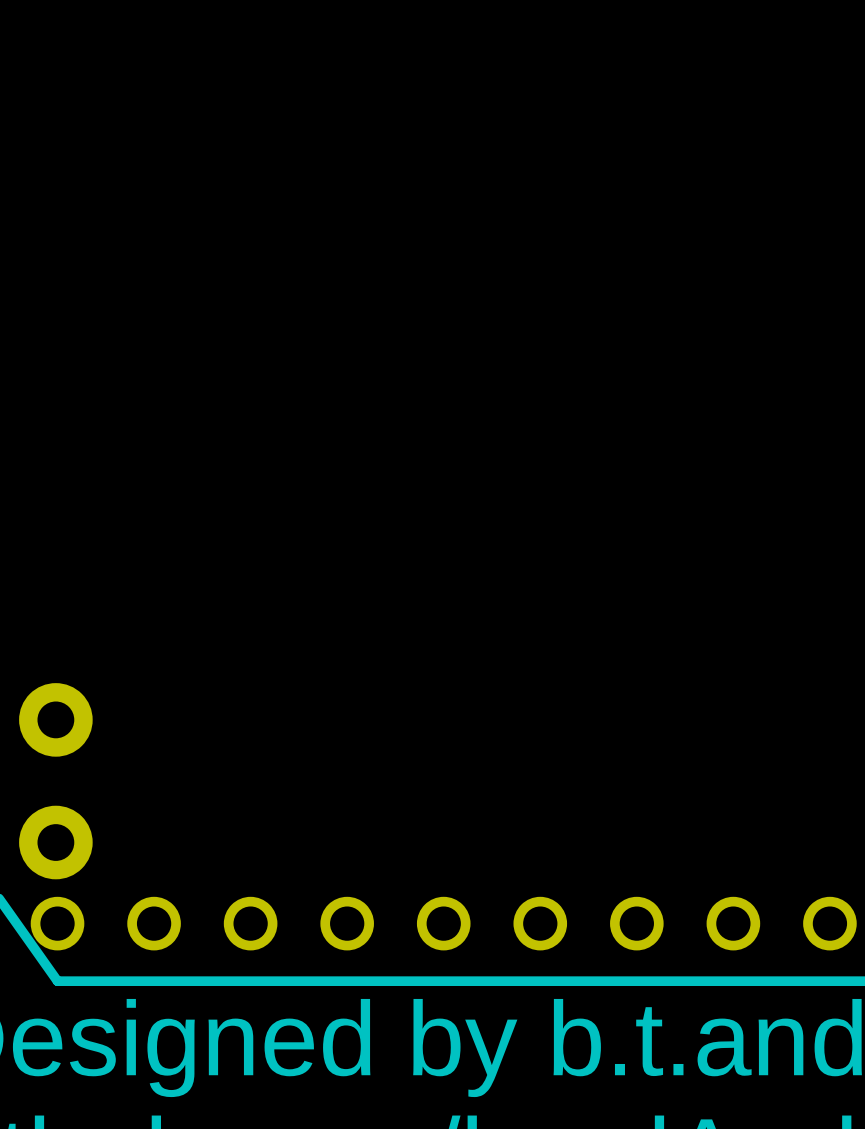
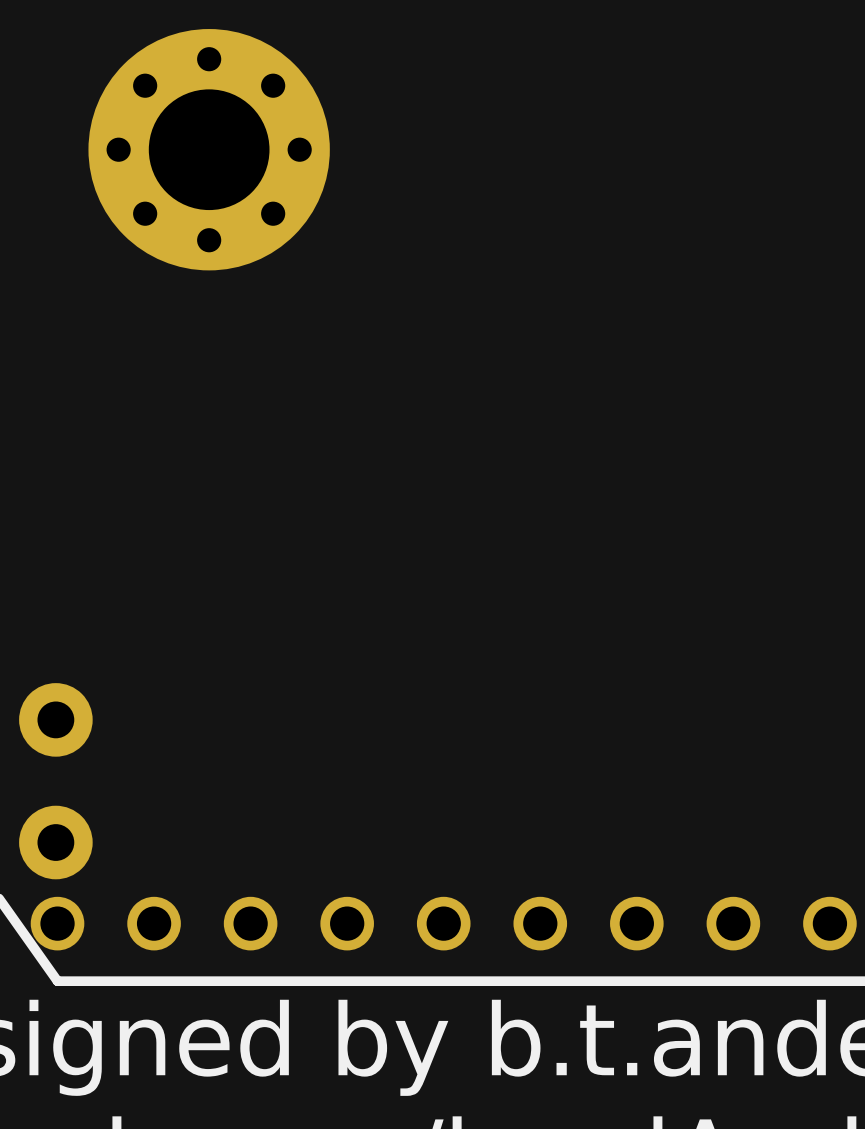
part: none -> (209, 149)

